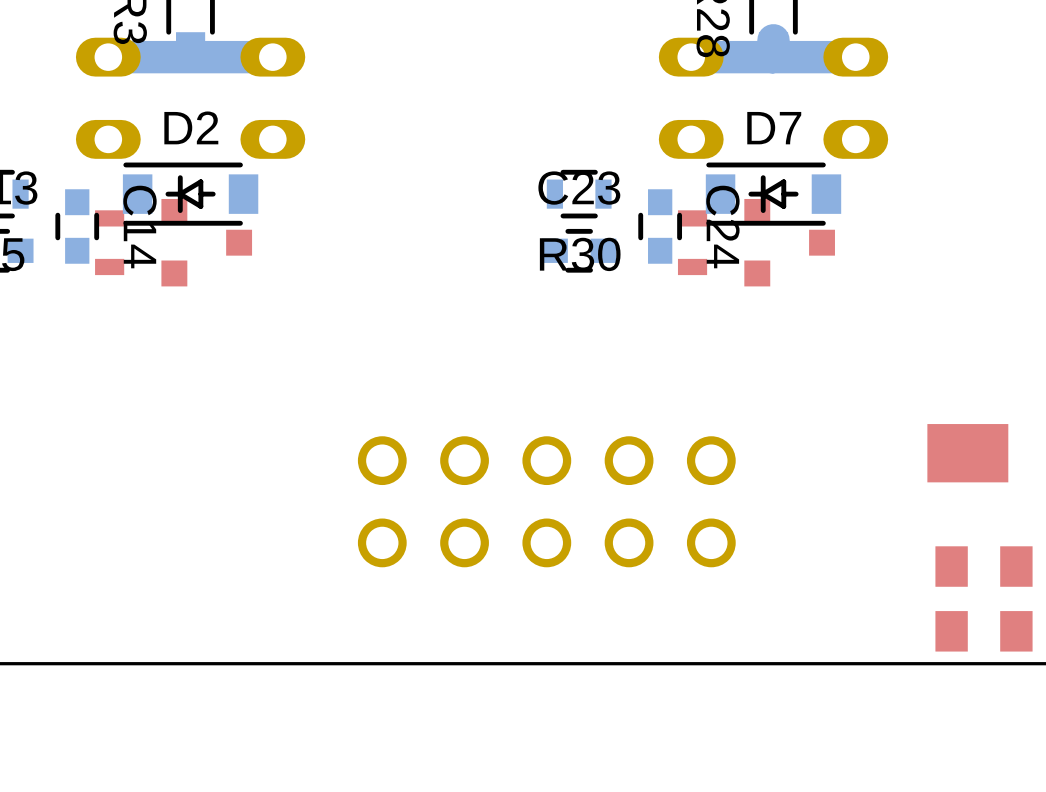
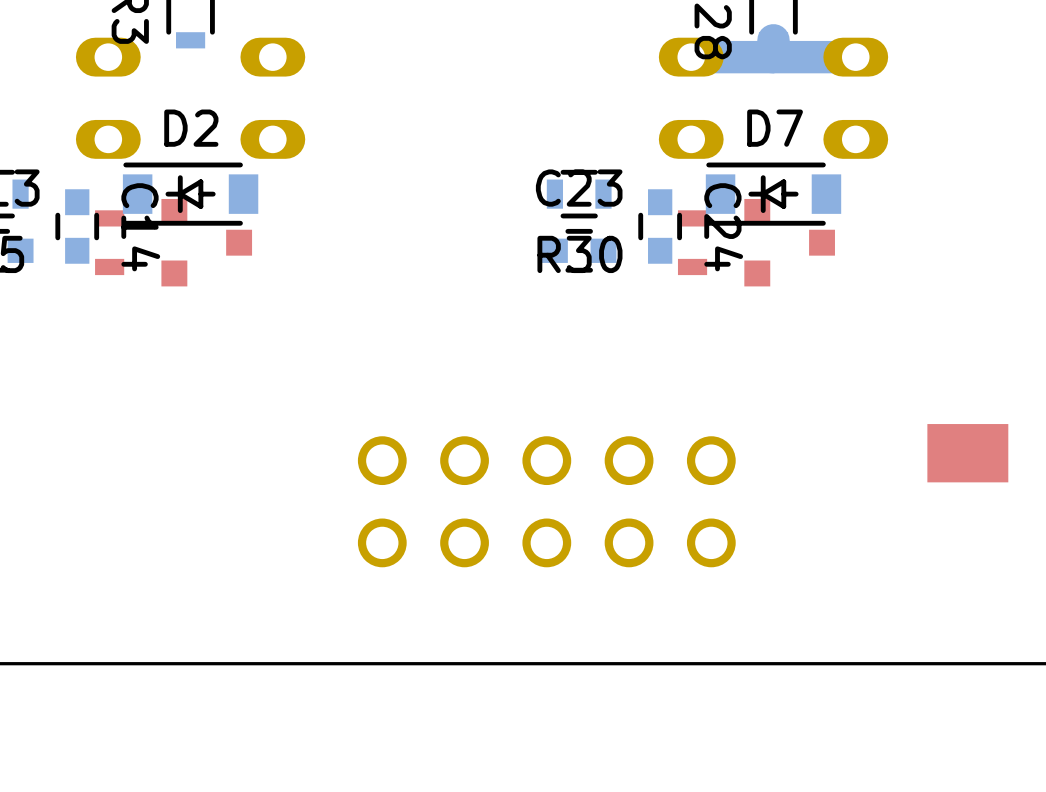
bottom track: (272, 57) (108, 57) -> none
part: (984, 566) -> none
part: (984, 631) -> none

